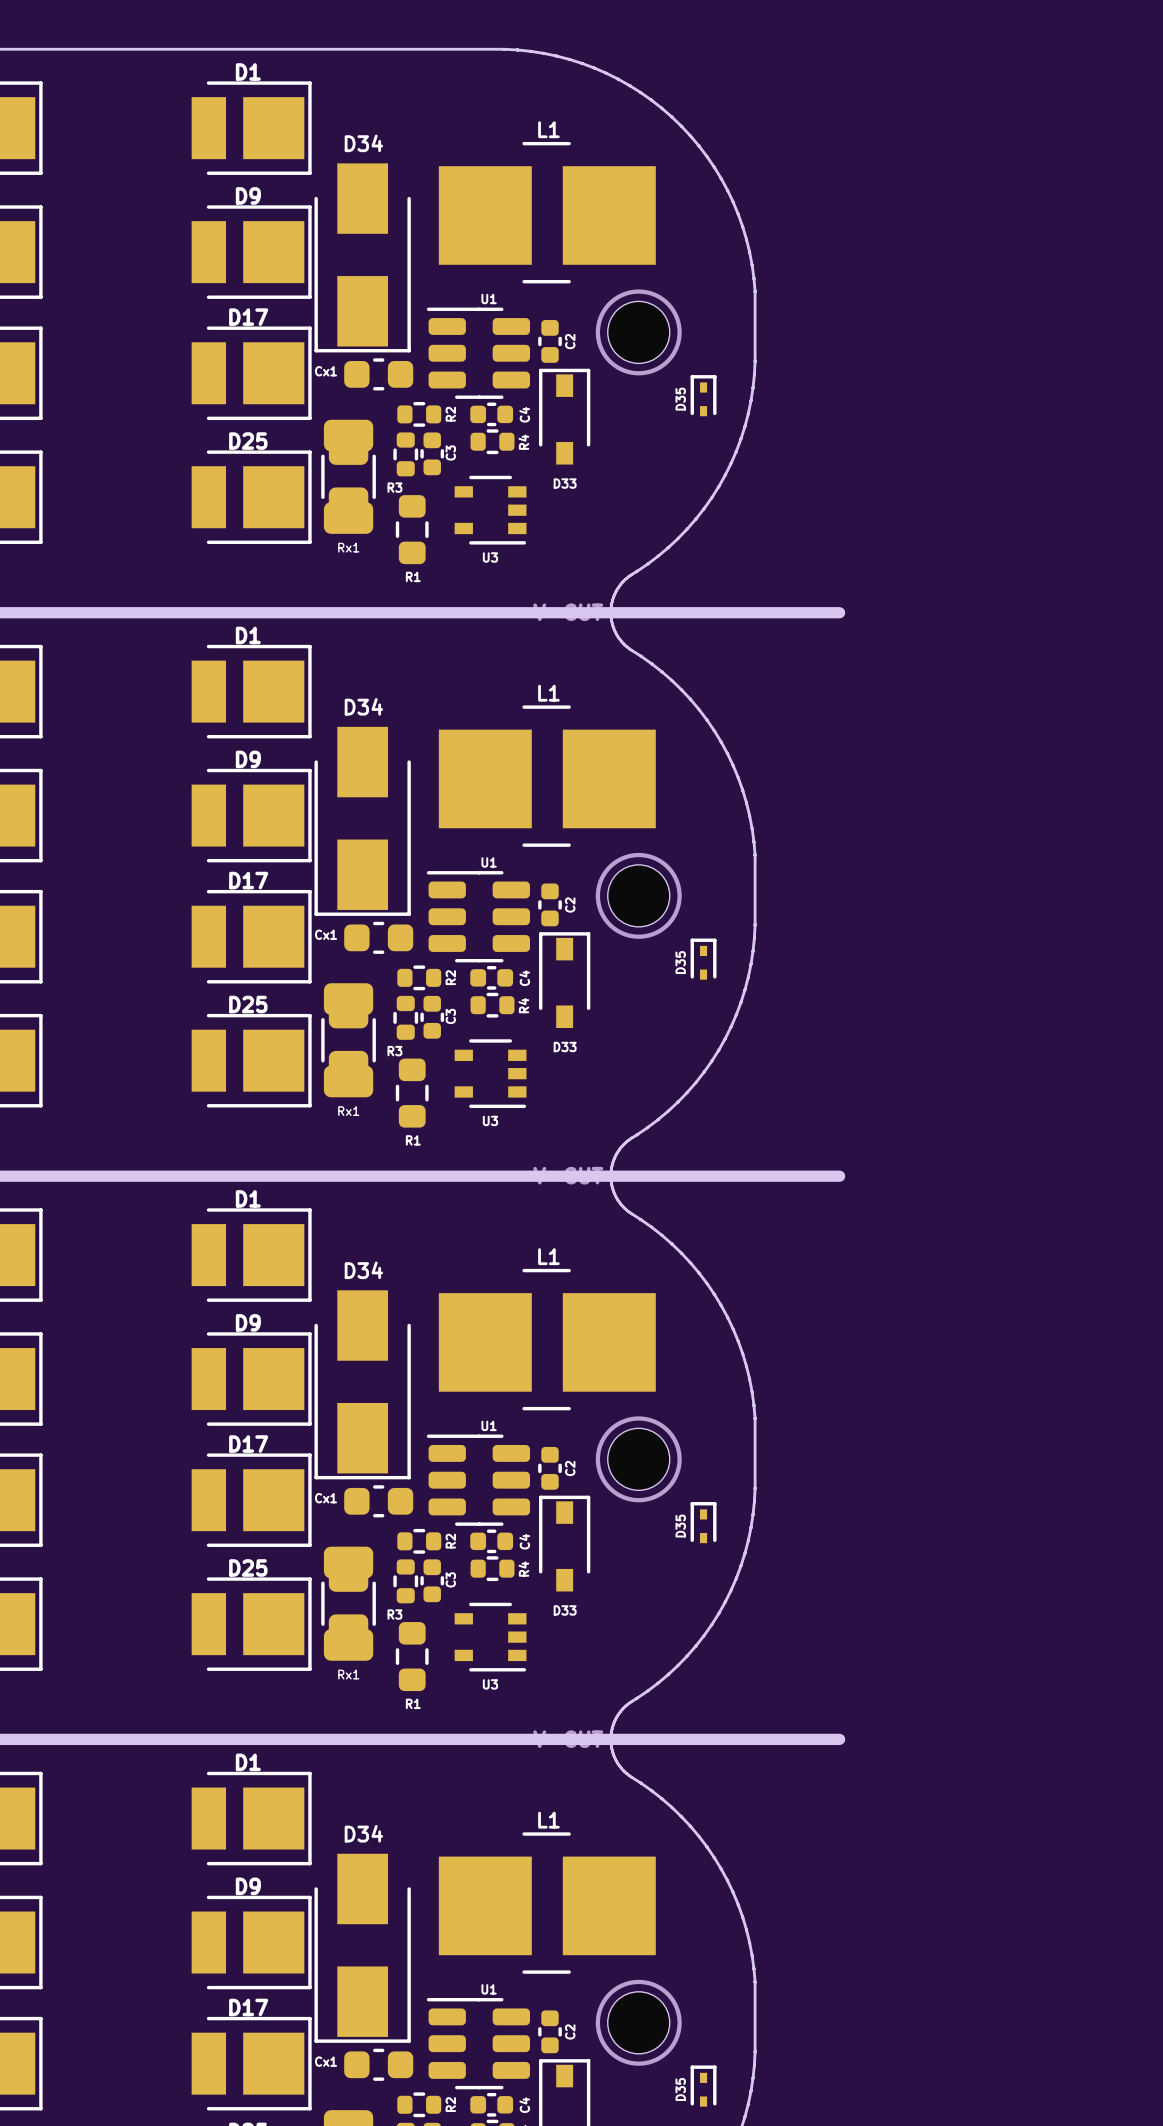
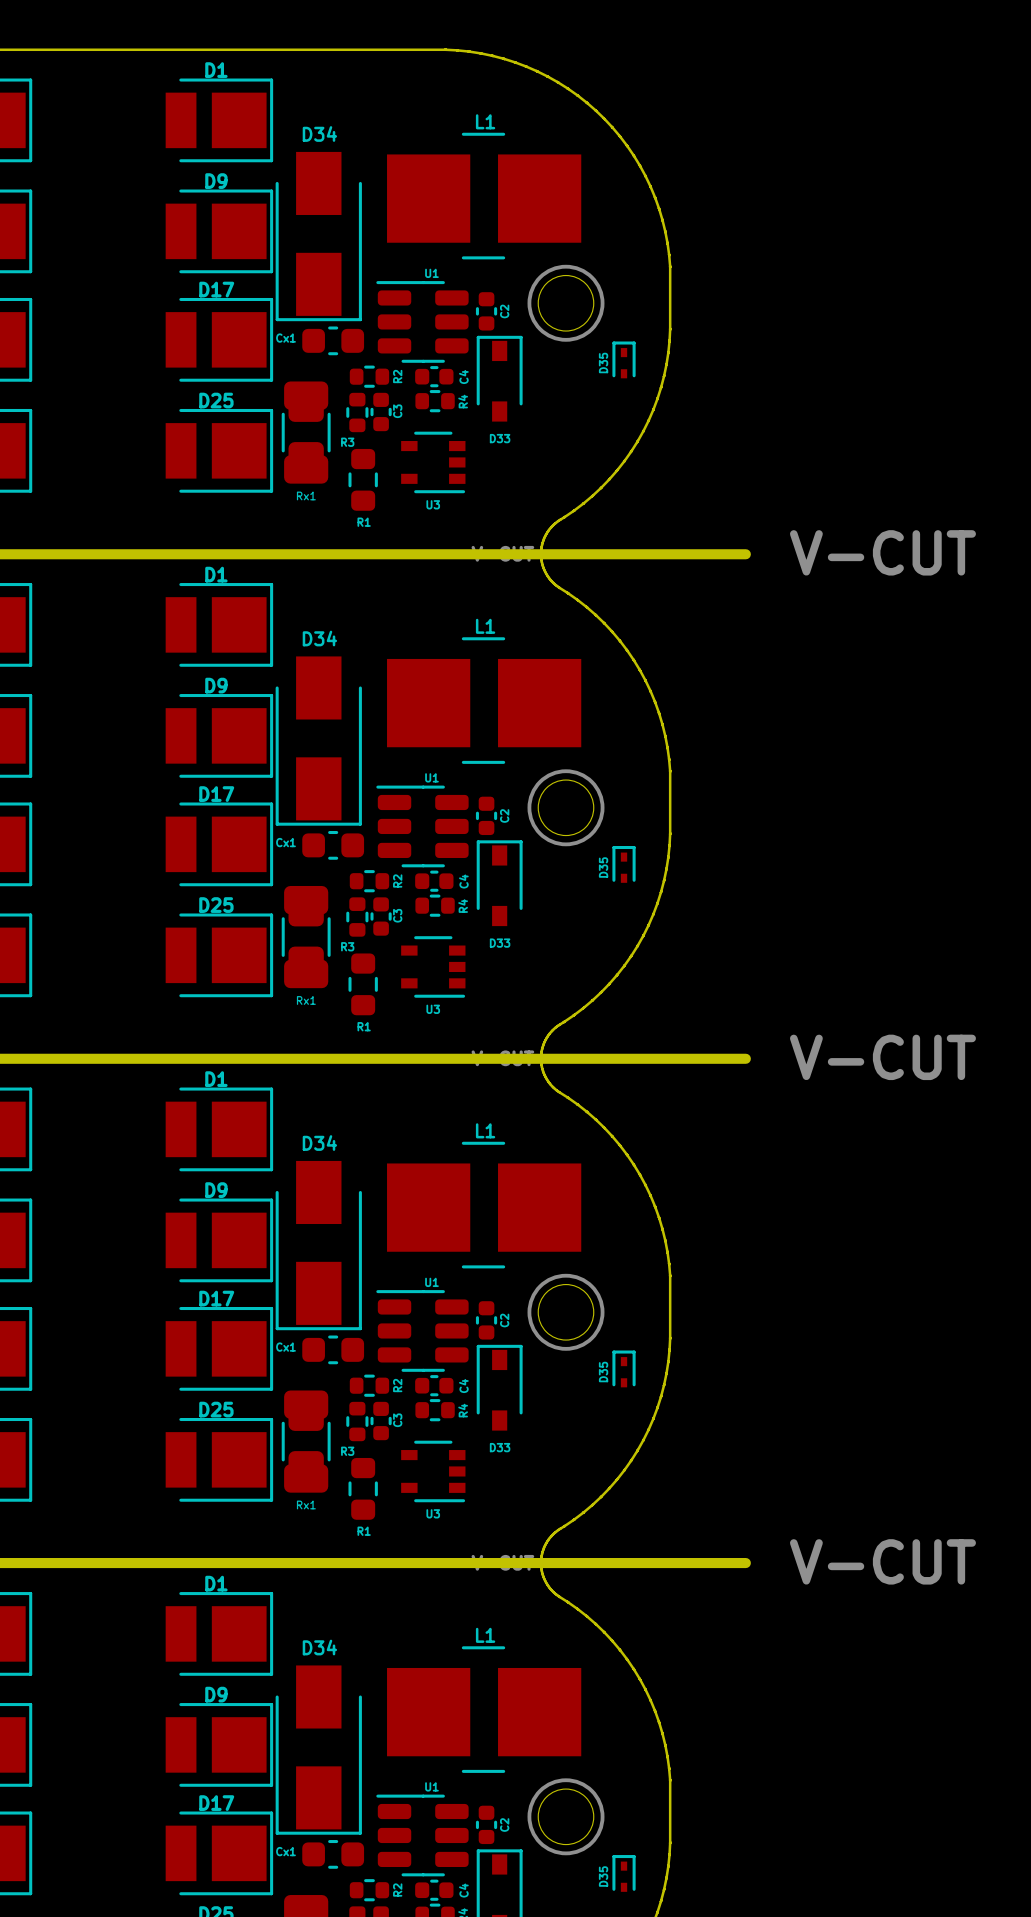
text: none -> V-CUT (882, 552)
text: none -> V-CUT (882, 1057)
text: none -> V-CUT (882, 1561)

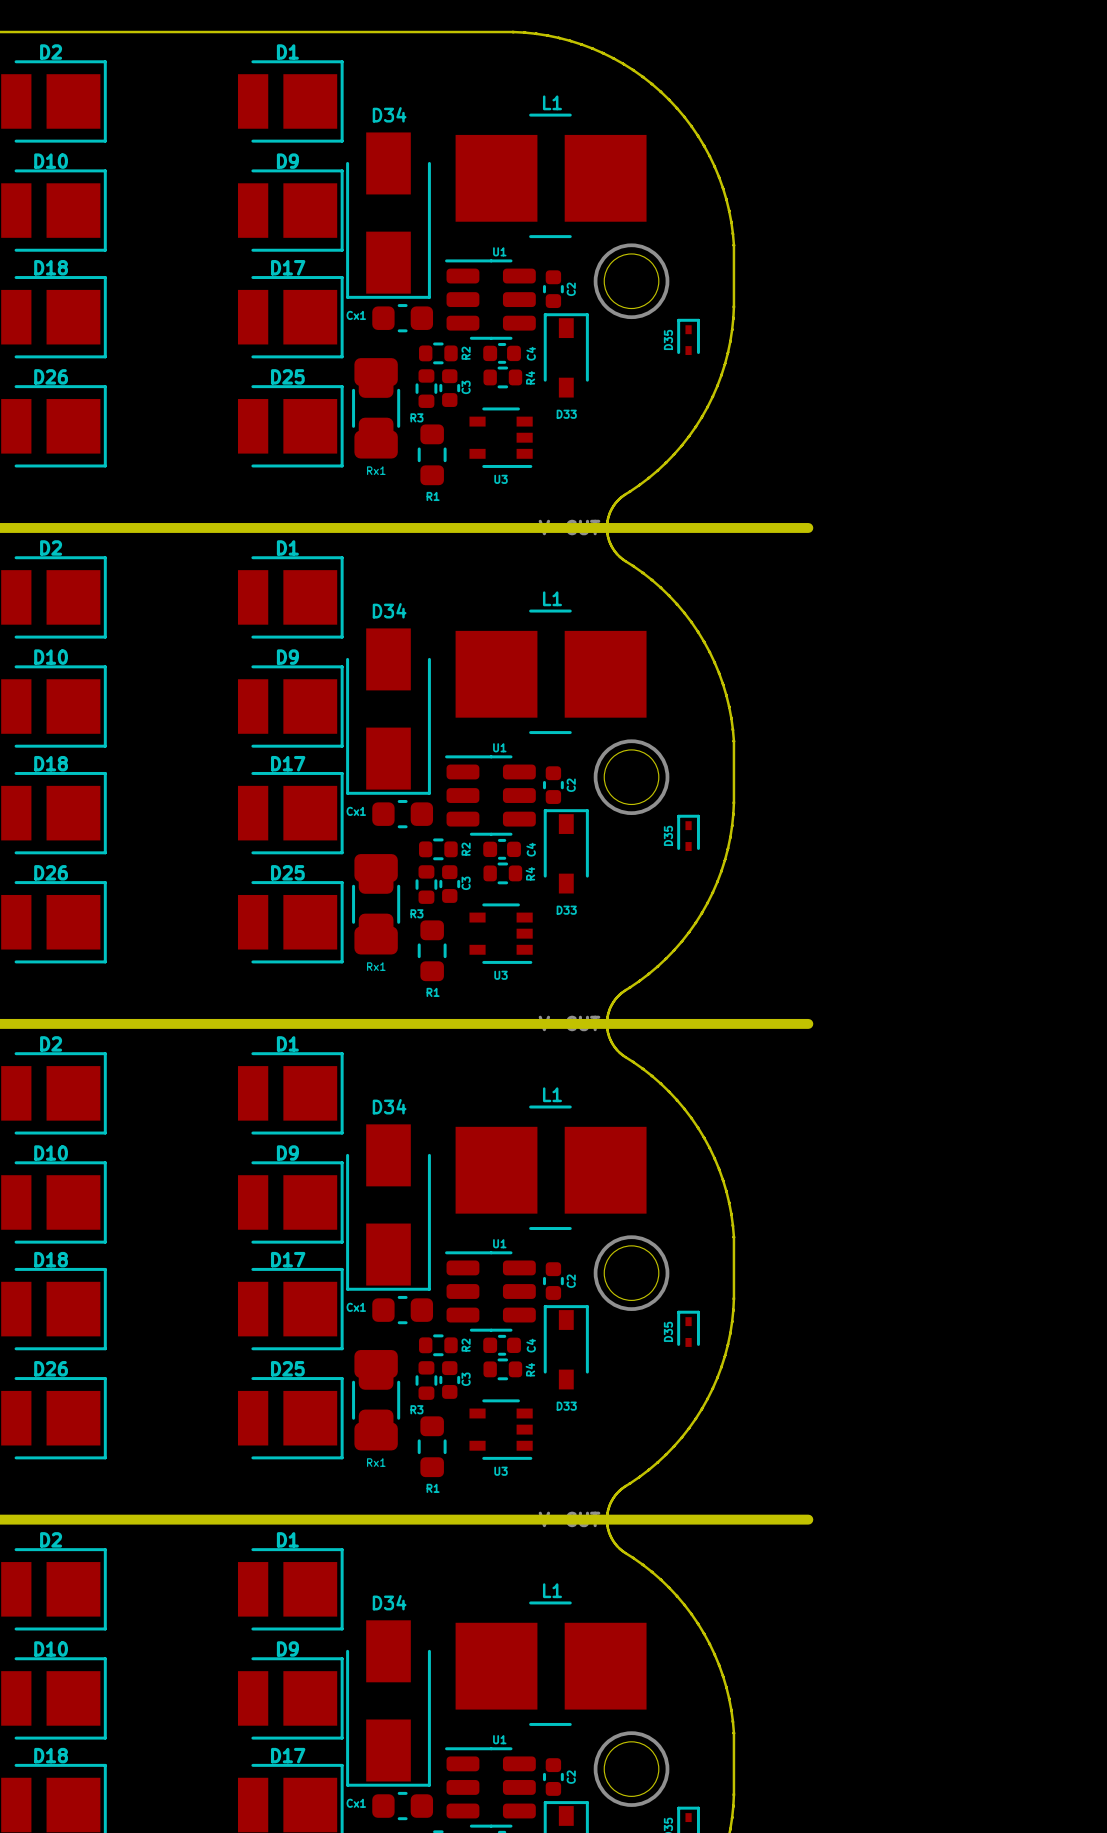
text: V-CUT (882, 552) -> none
text: V-CUT (882, 1057) -> none
text: V-CUT (882, 1561) -> none

